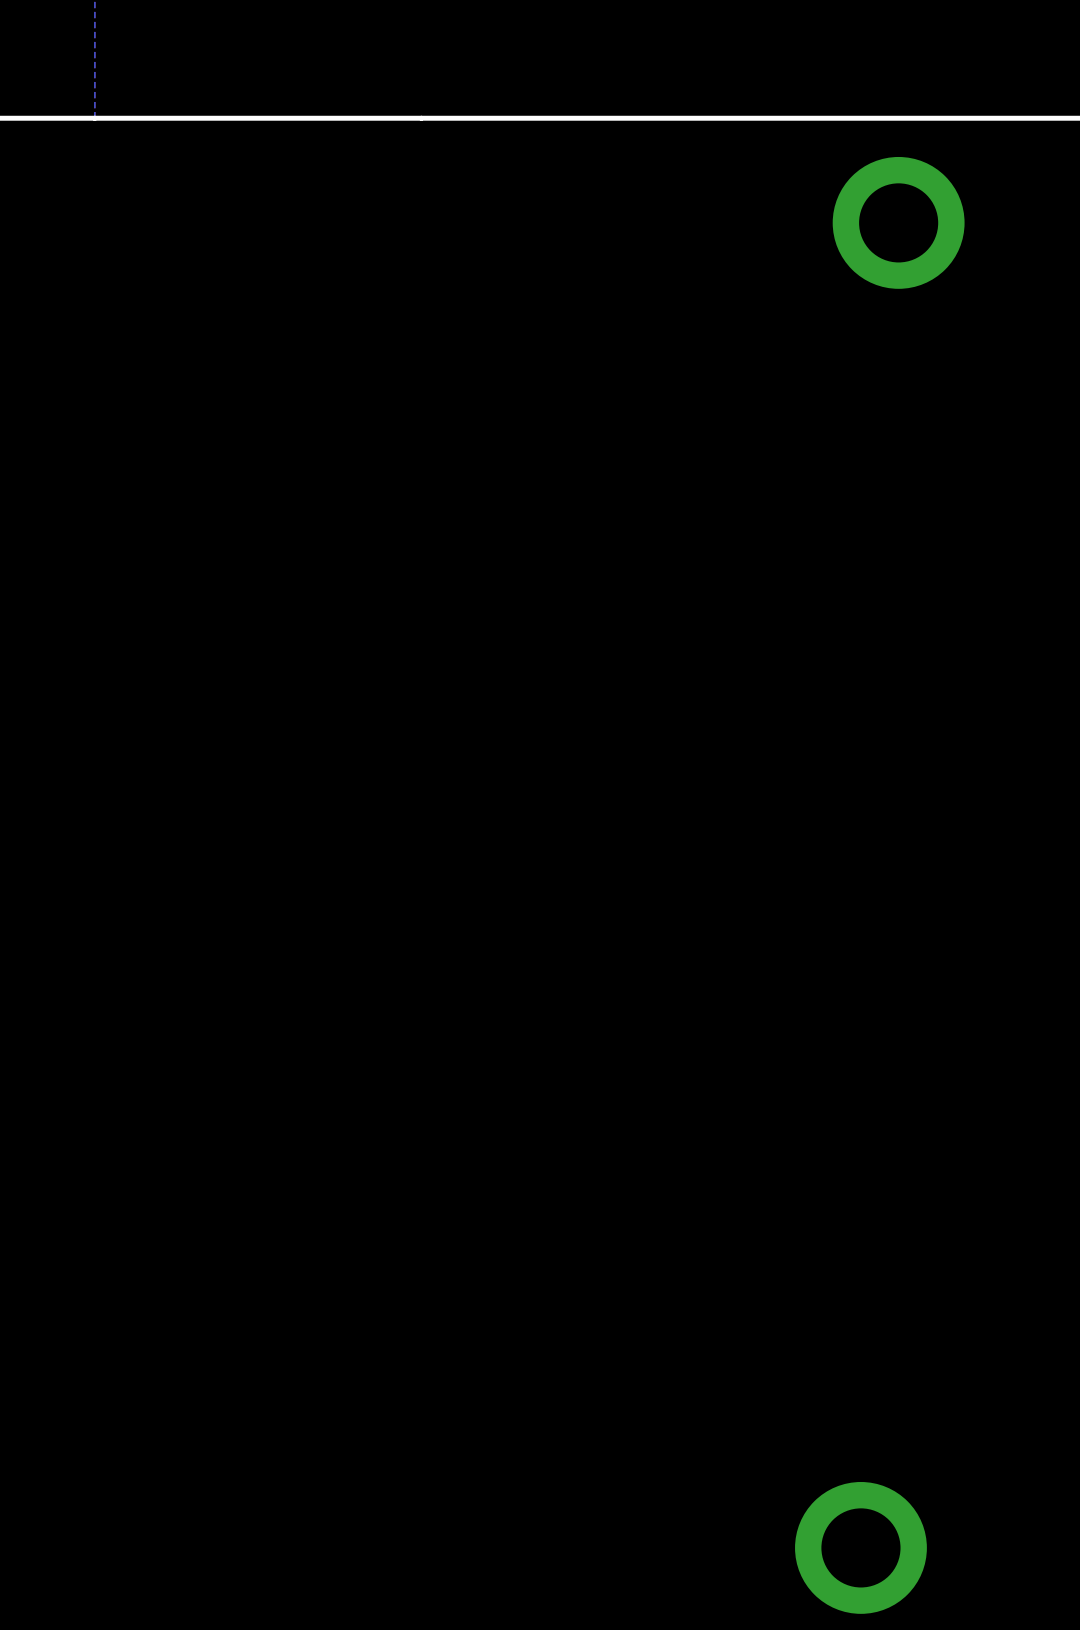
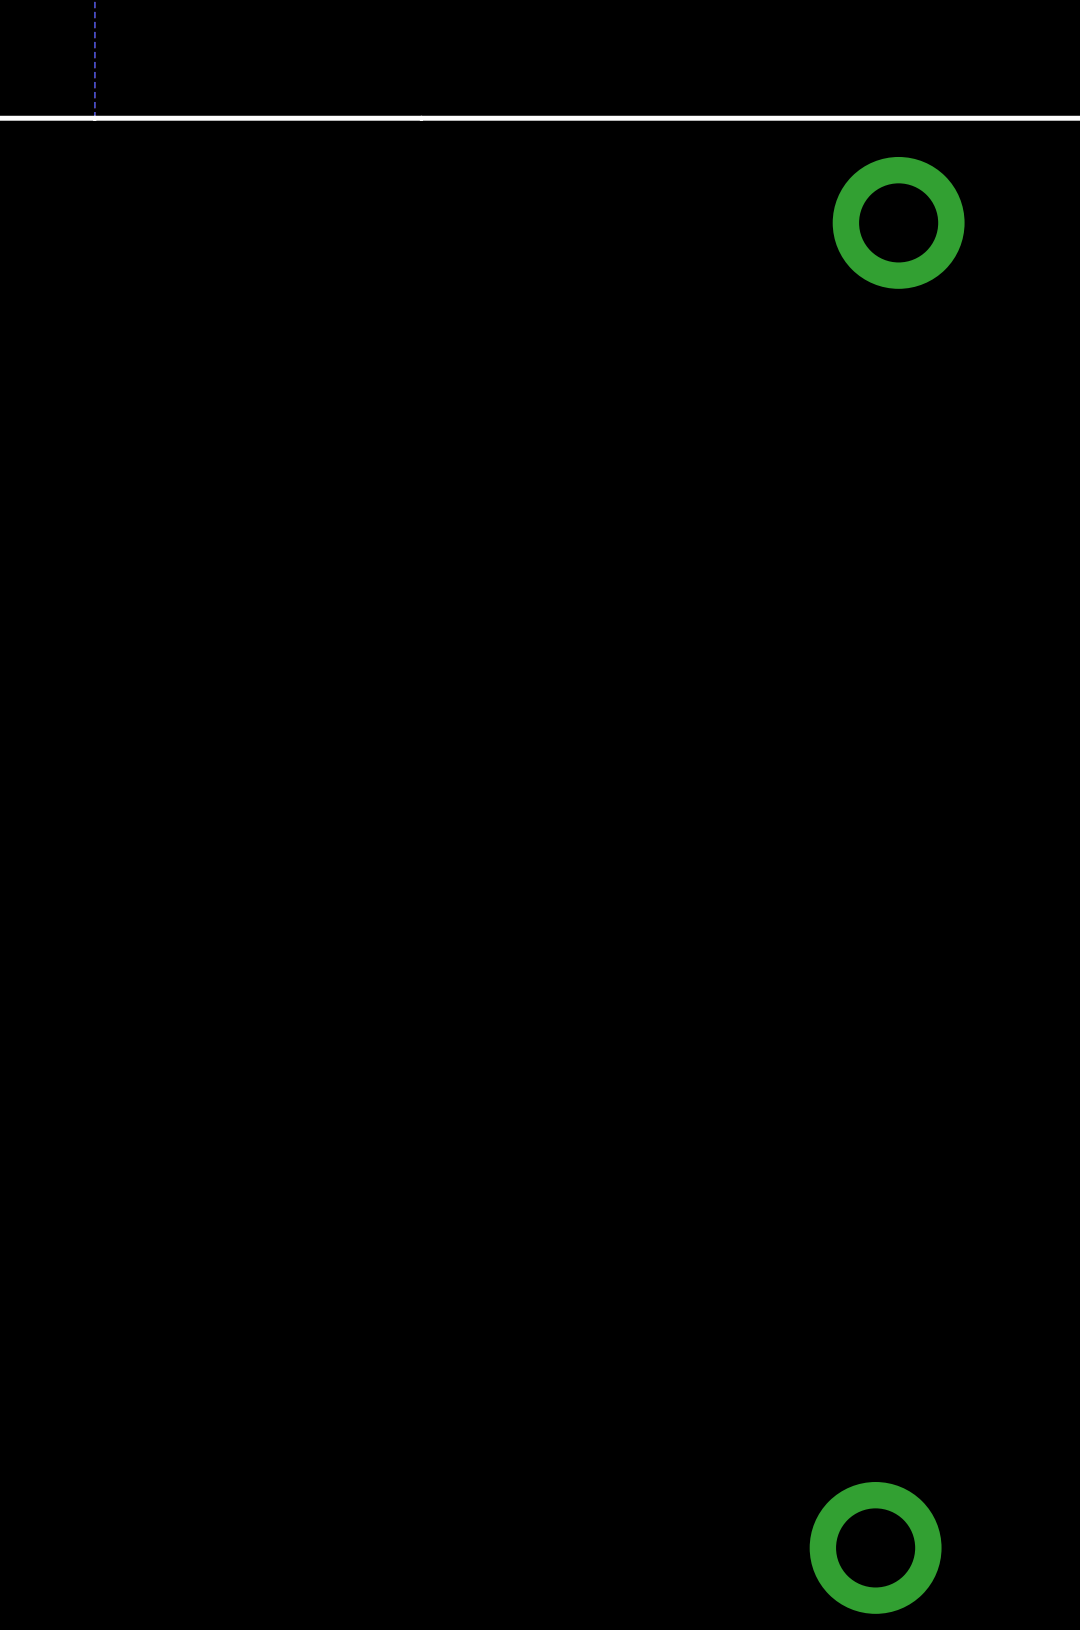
part position: (860, 1547) -> (875, 1547)

